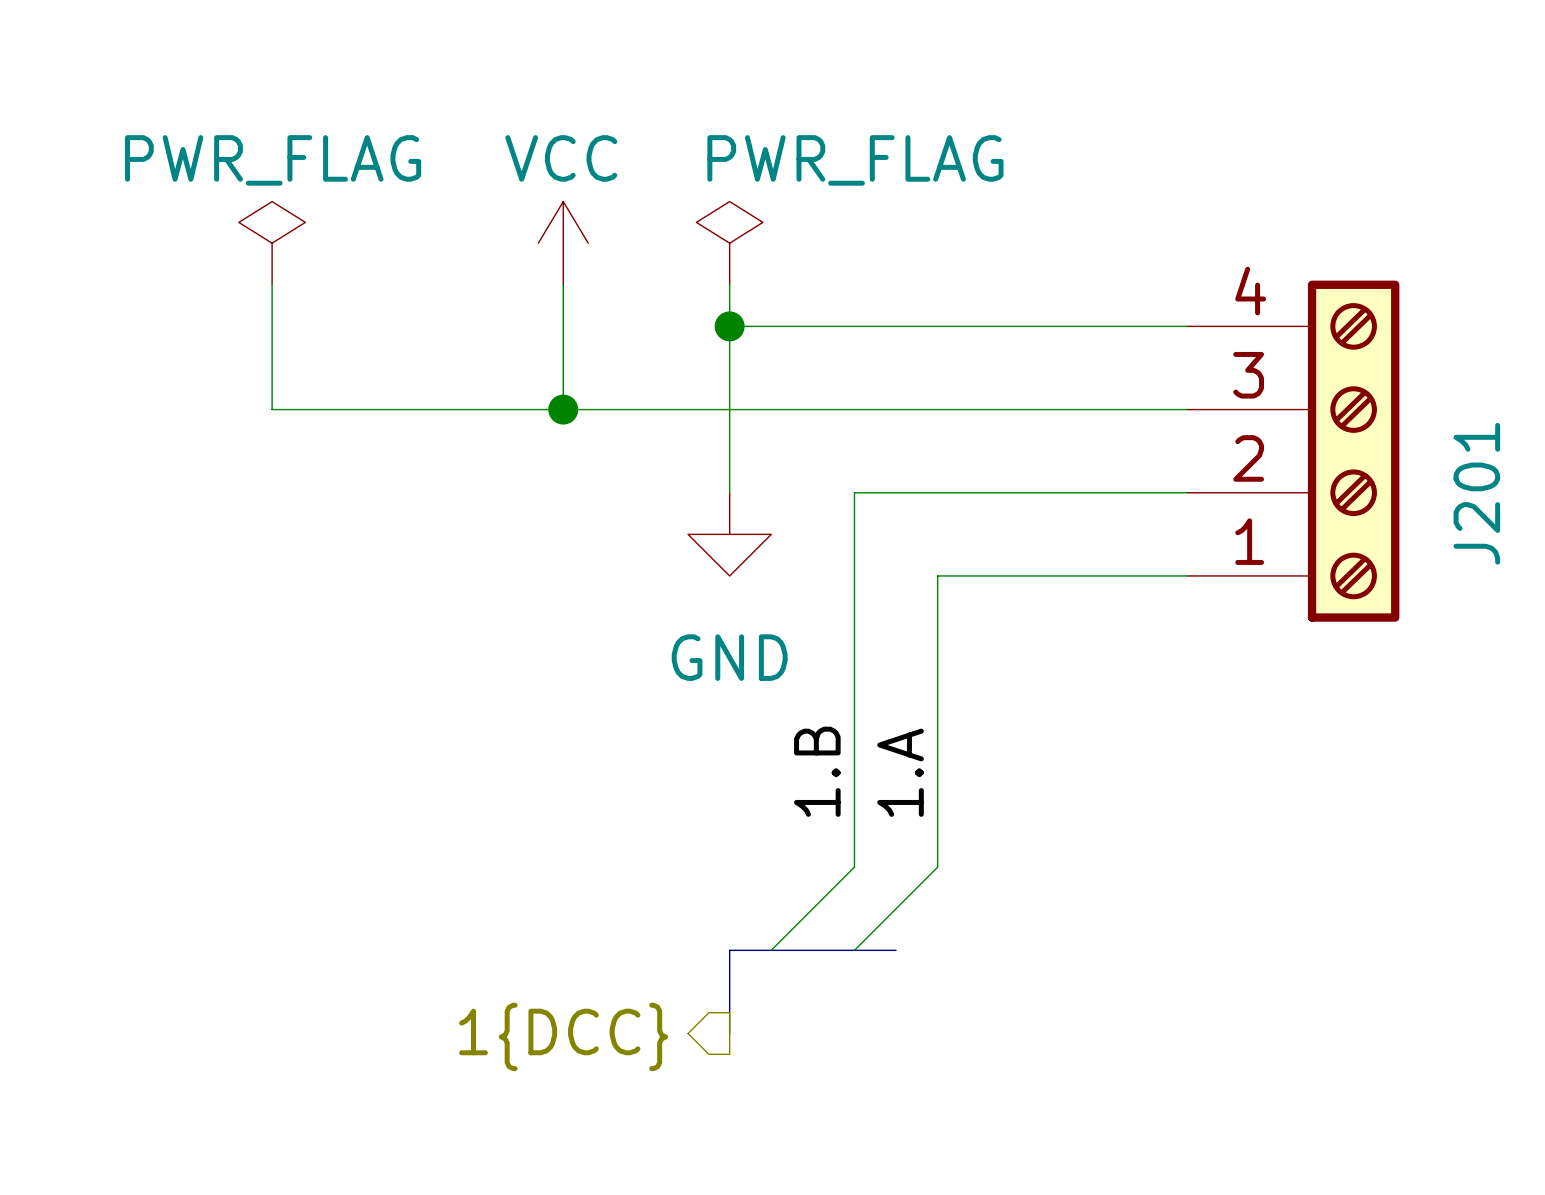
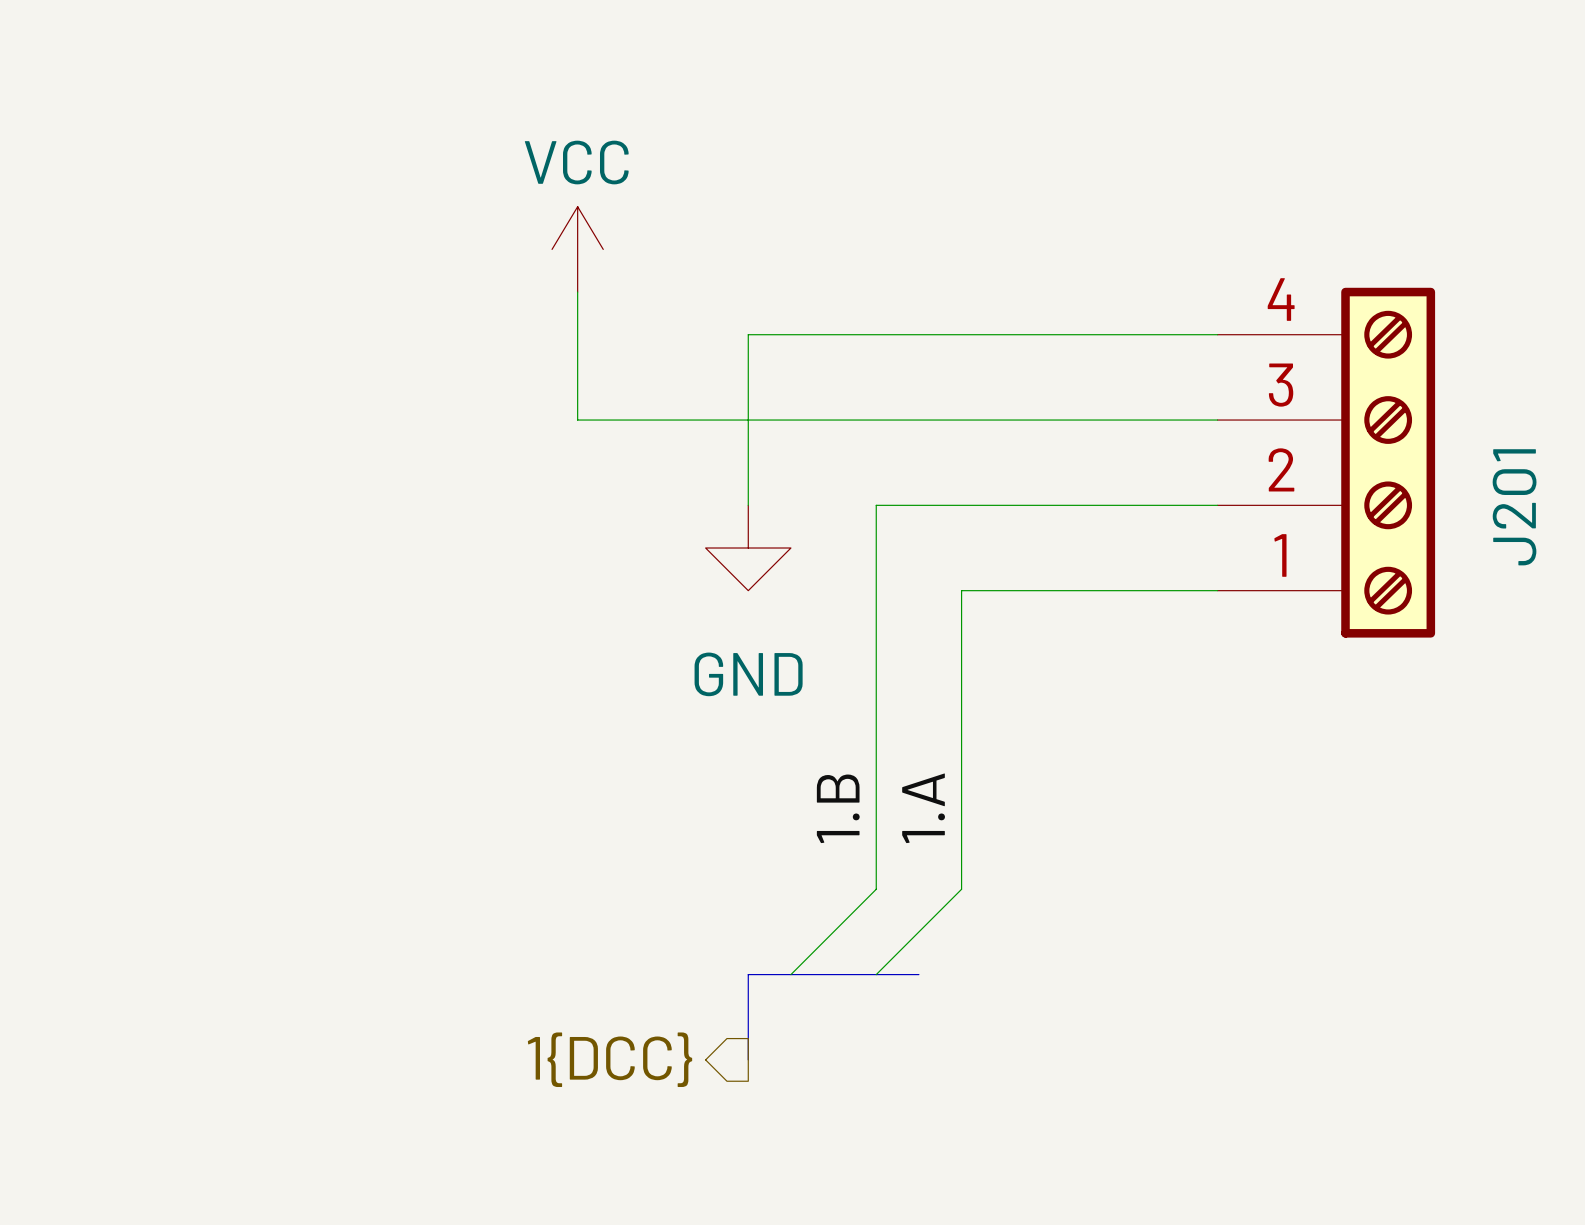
power symbol: PWR_FLAG (272, 243) -> none
power symbol: PWR_FLAG (729, 243) -> none
wire: (272, 284) (272, 409) (563, 409) -> none
wire: (729, 284) (729, 326) -> none
junction: (729, 326) -> none
junction: (563, 409) -> none

